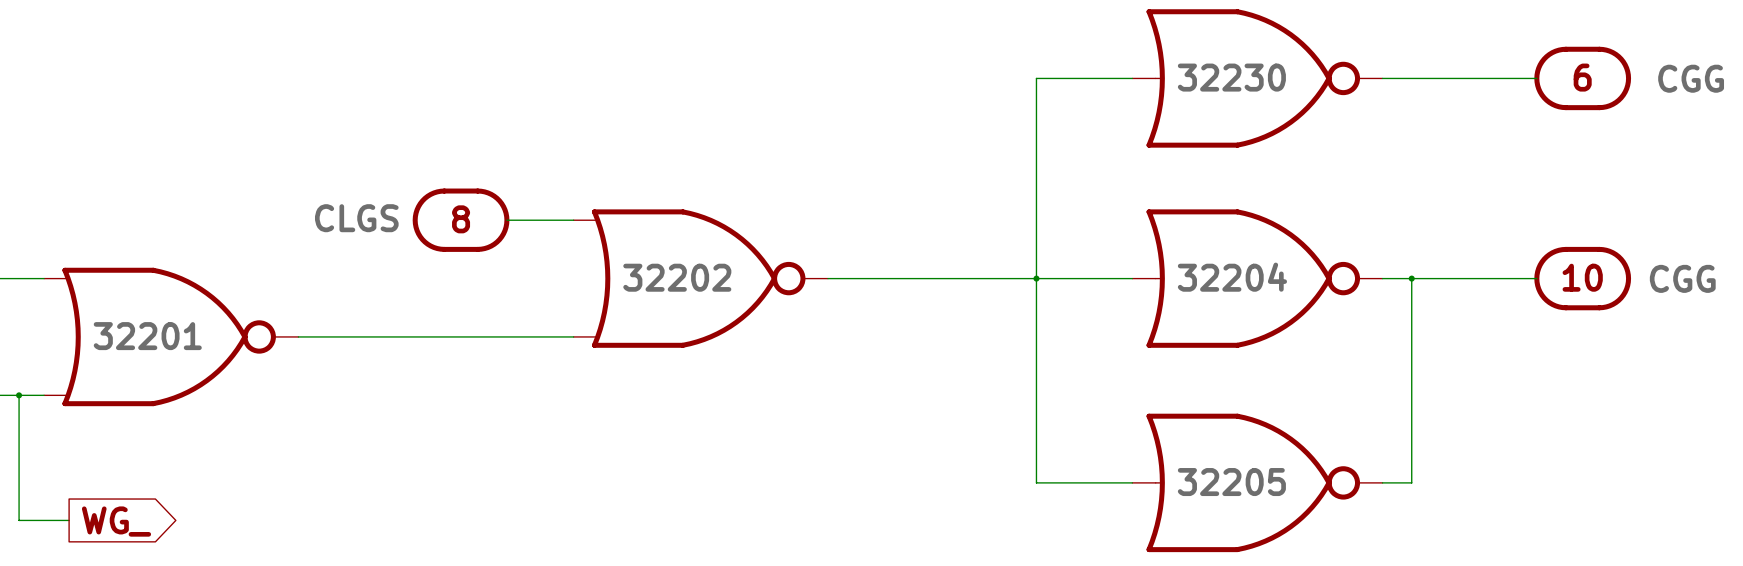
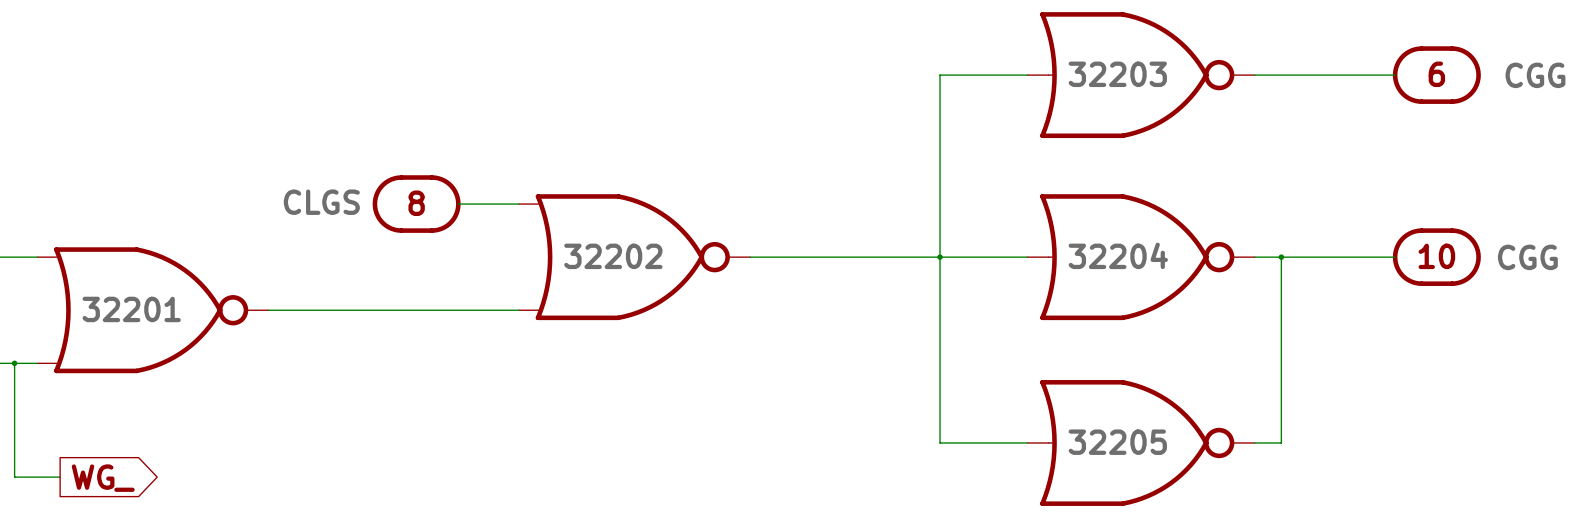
part text: 32230 (1231, 77) -> 32203 (1117, 74)

